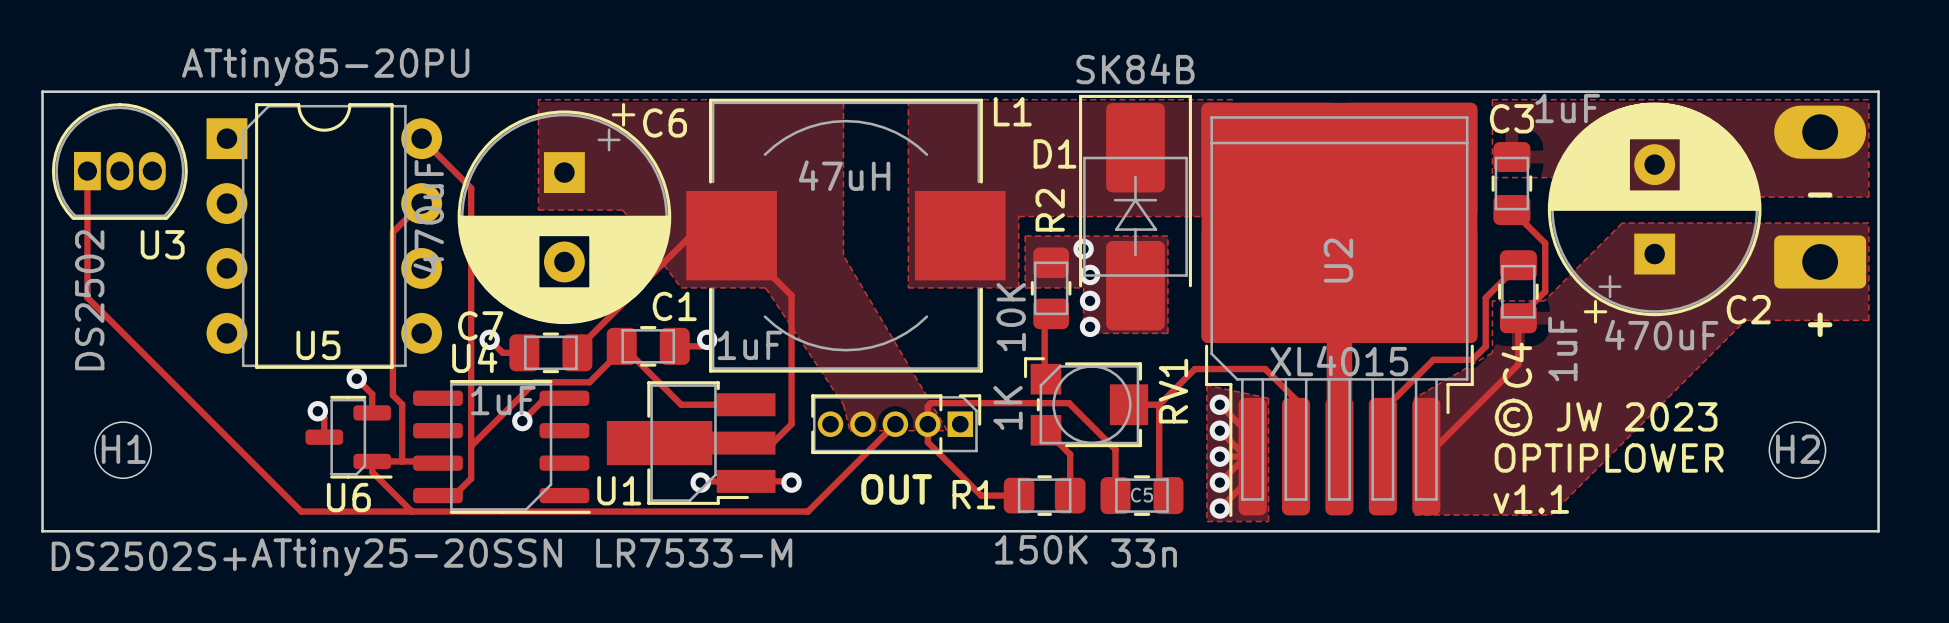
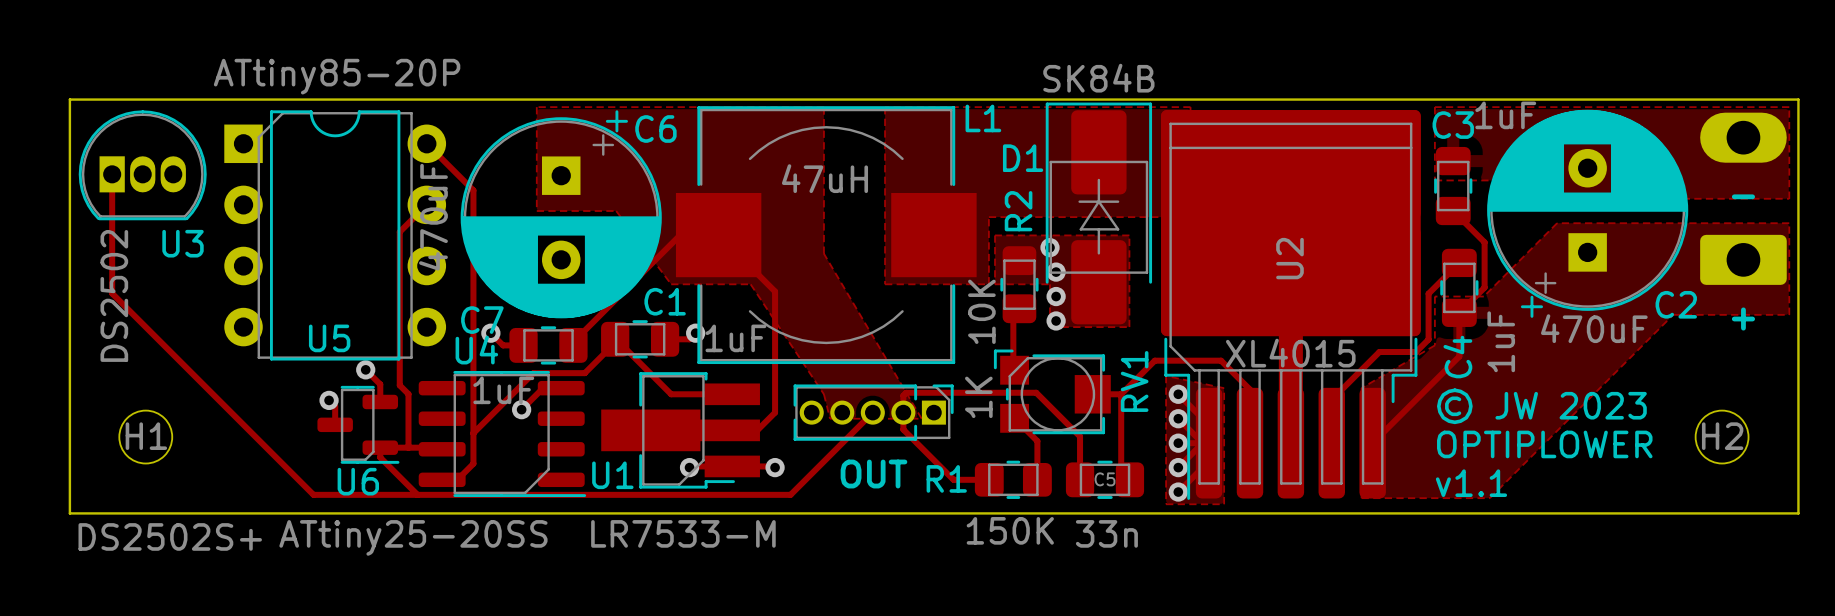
U5 value: ATtiny85-20PU (325, 67) -> ATtiny85-20P (337, 76)
U4 value: ATtiny25-20SSN (406, 557) -> ATtiny25-20SS (413, 537)

